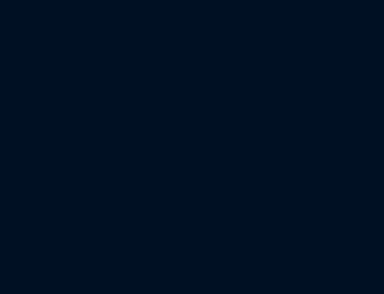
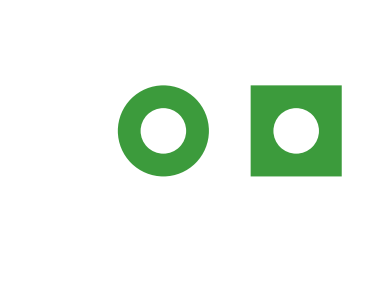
part: none -> (229, 130)

